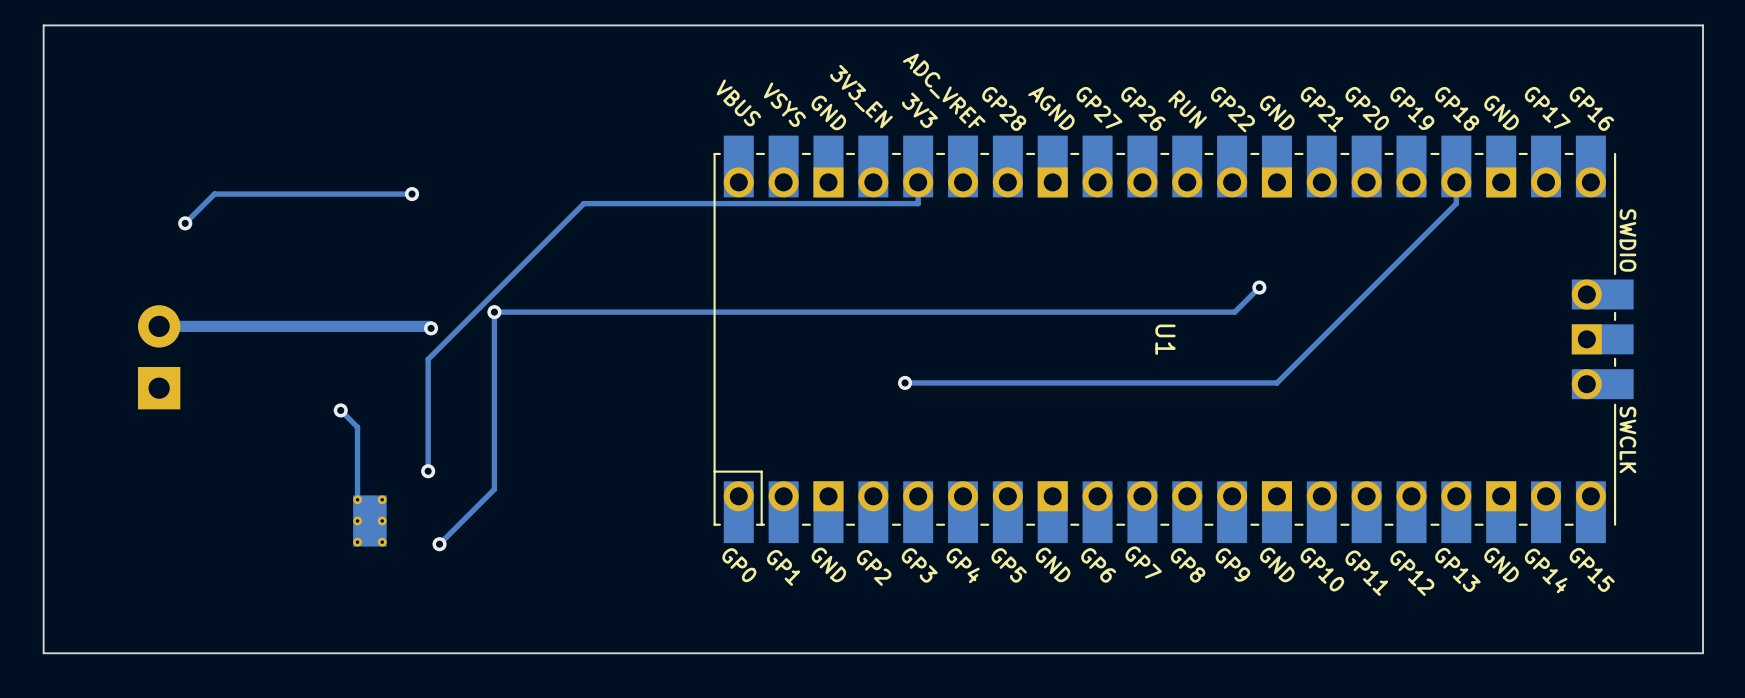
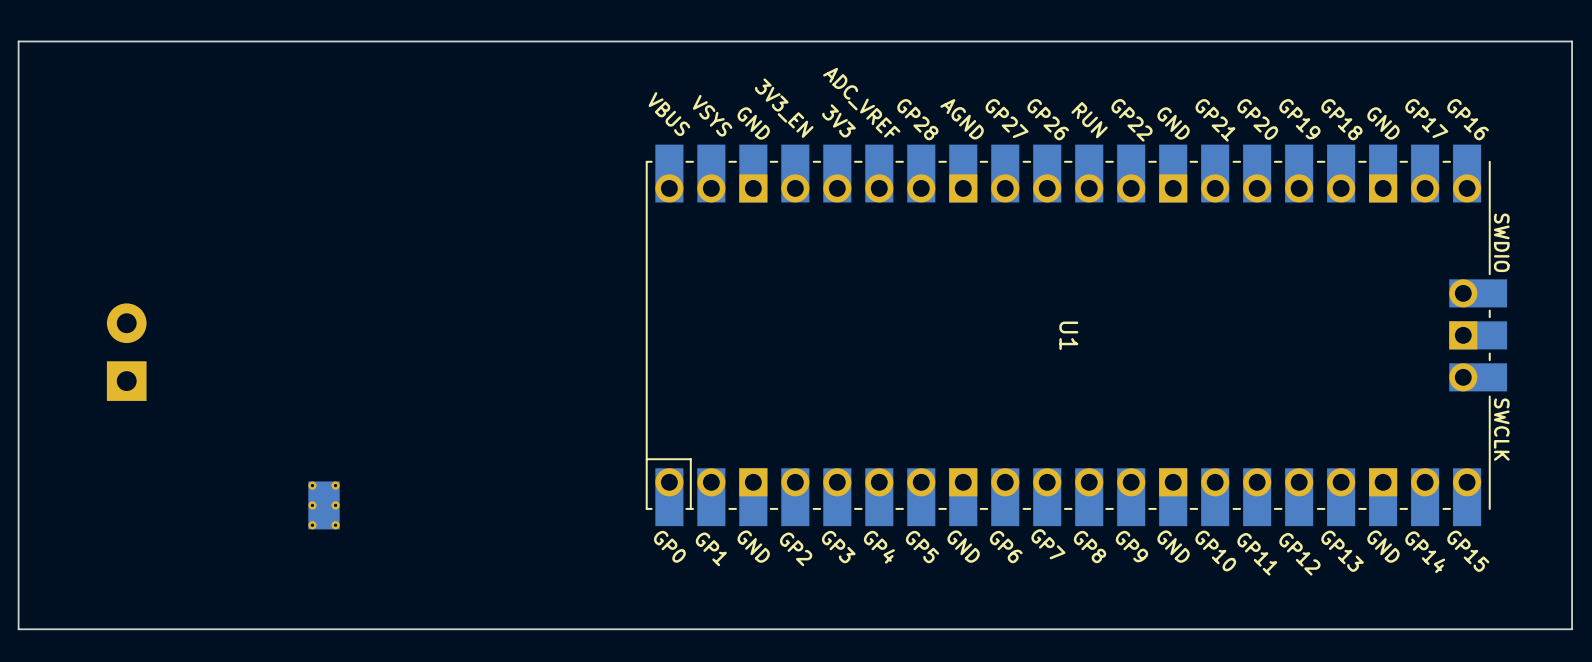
track: (918, 182) (918, 203) (583, 203) (428, 359) (428, 471) -> none
track: (1456, 182) (1456, 203) (1277, 382) (905, 382) -> none
track: (412, 194) (214, 194) (185, 223) -> none
via: (412, 194) -> none
via: (185, 223) -> none
track: (1259, 287) (1234, 312) (494, 312) (494, 489) (439, 544) -> none
via: (1259, 287) -> none
via: (494, 312) -> none
track: (159, 326) (429, 326) (431, 328) -> none
via: (431, 328) -> none
via: (905, 382) -> none
track: (340, 410) (357, 427) (357, 542) -> none
via: (340, 410) -> none
via: (428, 471) -> none
via: (439, 544) -> none

